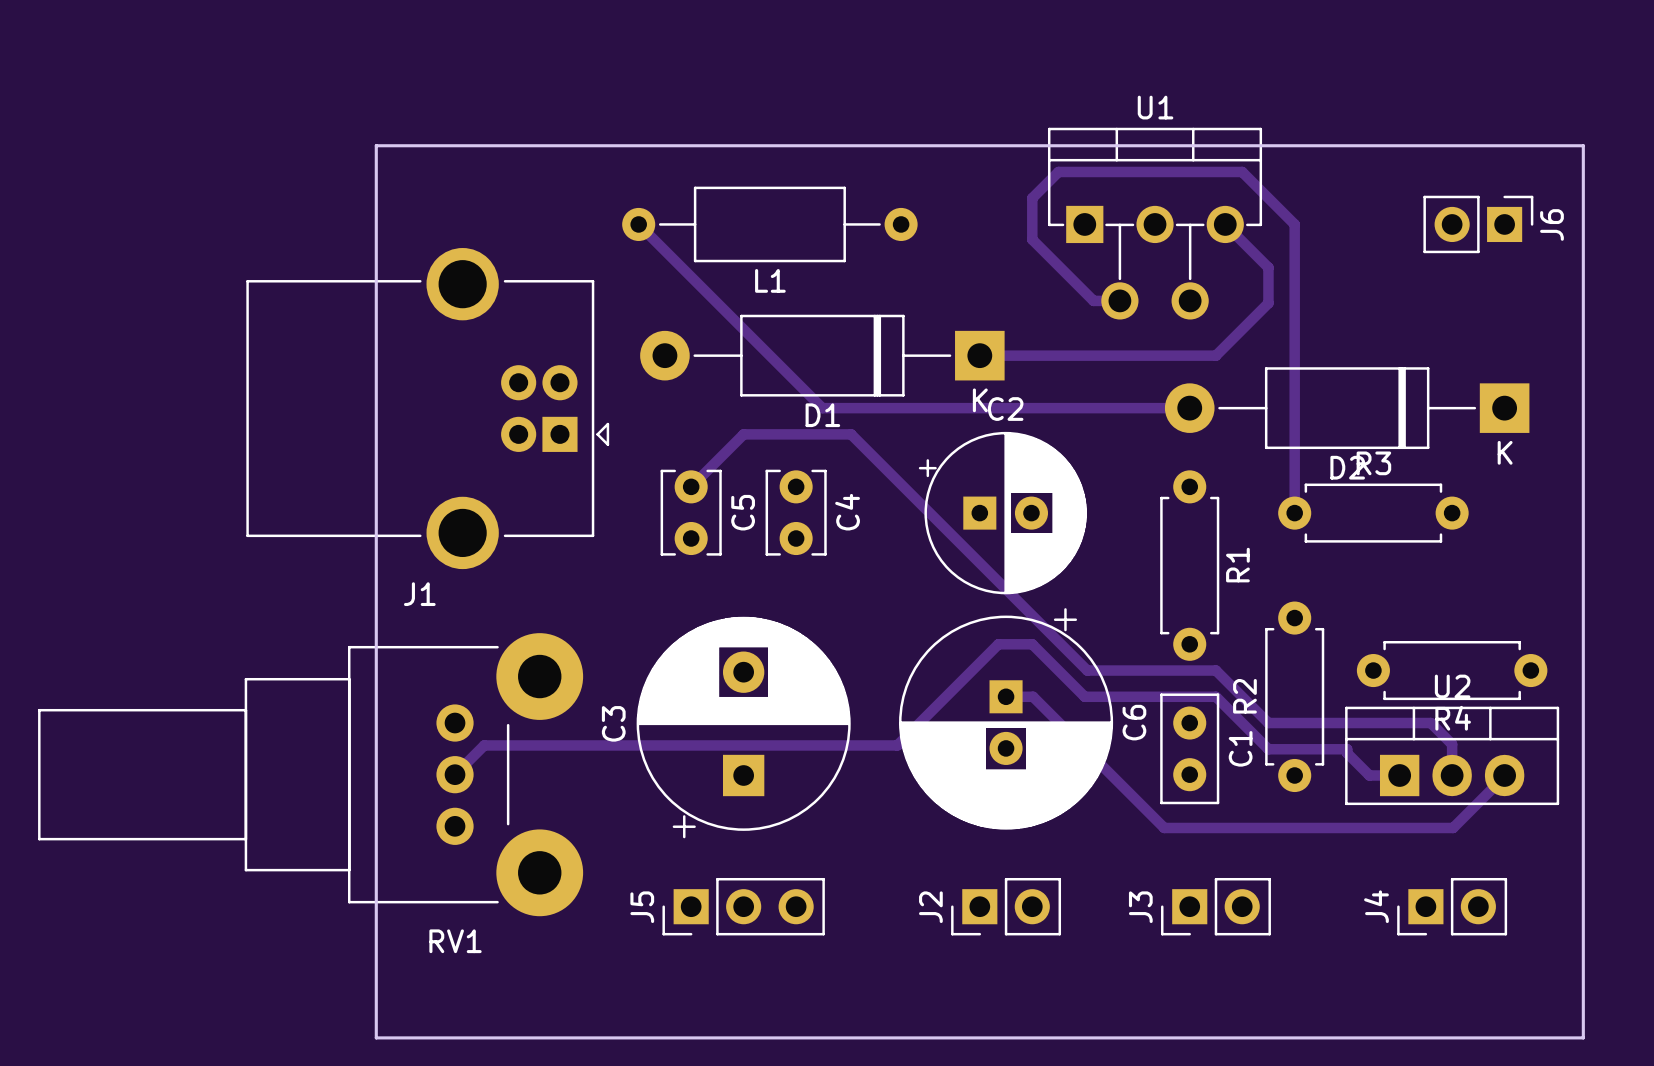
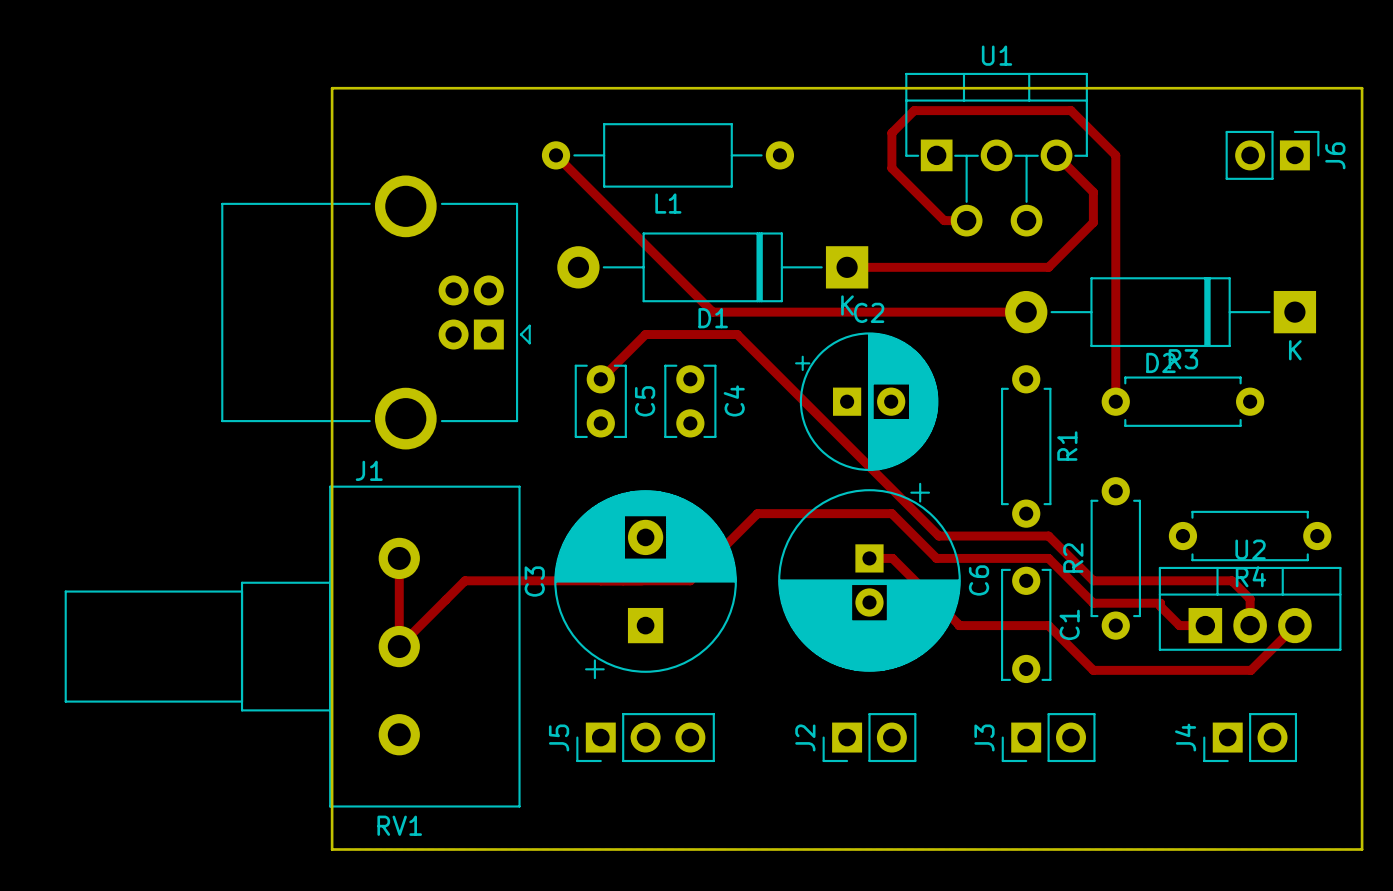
RV1 footprint: [38, 633, 584, 917] -> [64, 485, 521, 808]
track: (998, 644) (897, 745) (484, 745) (455, 774) -> (863, 513) (757, 513) (690, 580) (465, 580) (399, 646) (399, 558)
C1 footprint: [1160, 693, 1220, 805] -> [1001, 566, 1052, 684]
track: (1111, 774) (1164, 827) (1268, 827) -> (959, 624) (1048, 625) (1093, 670)
RV1 name position: RV1 (455, 941) -> RV1 (399, 825)

